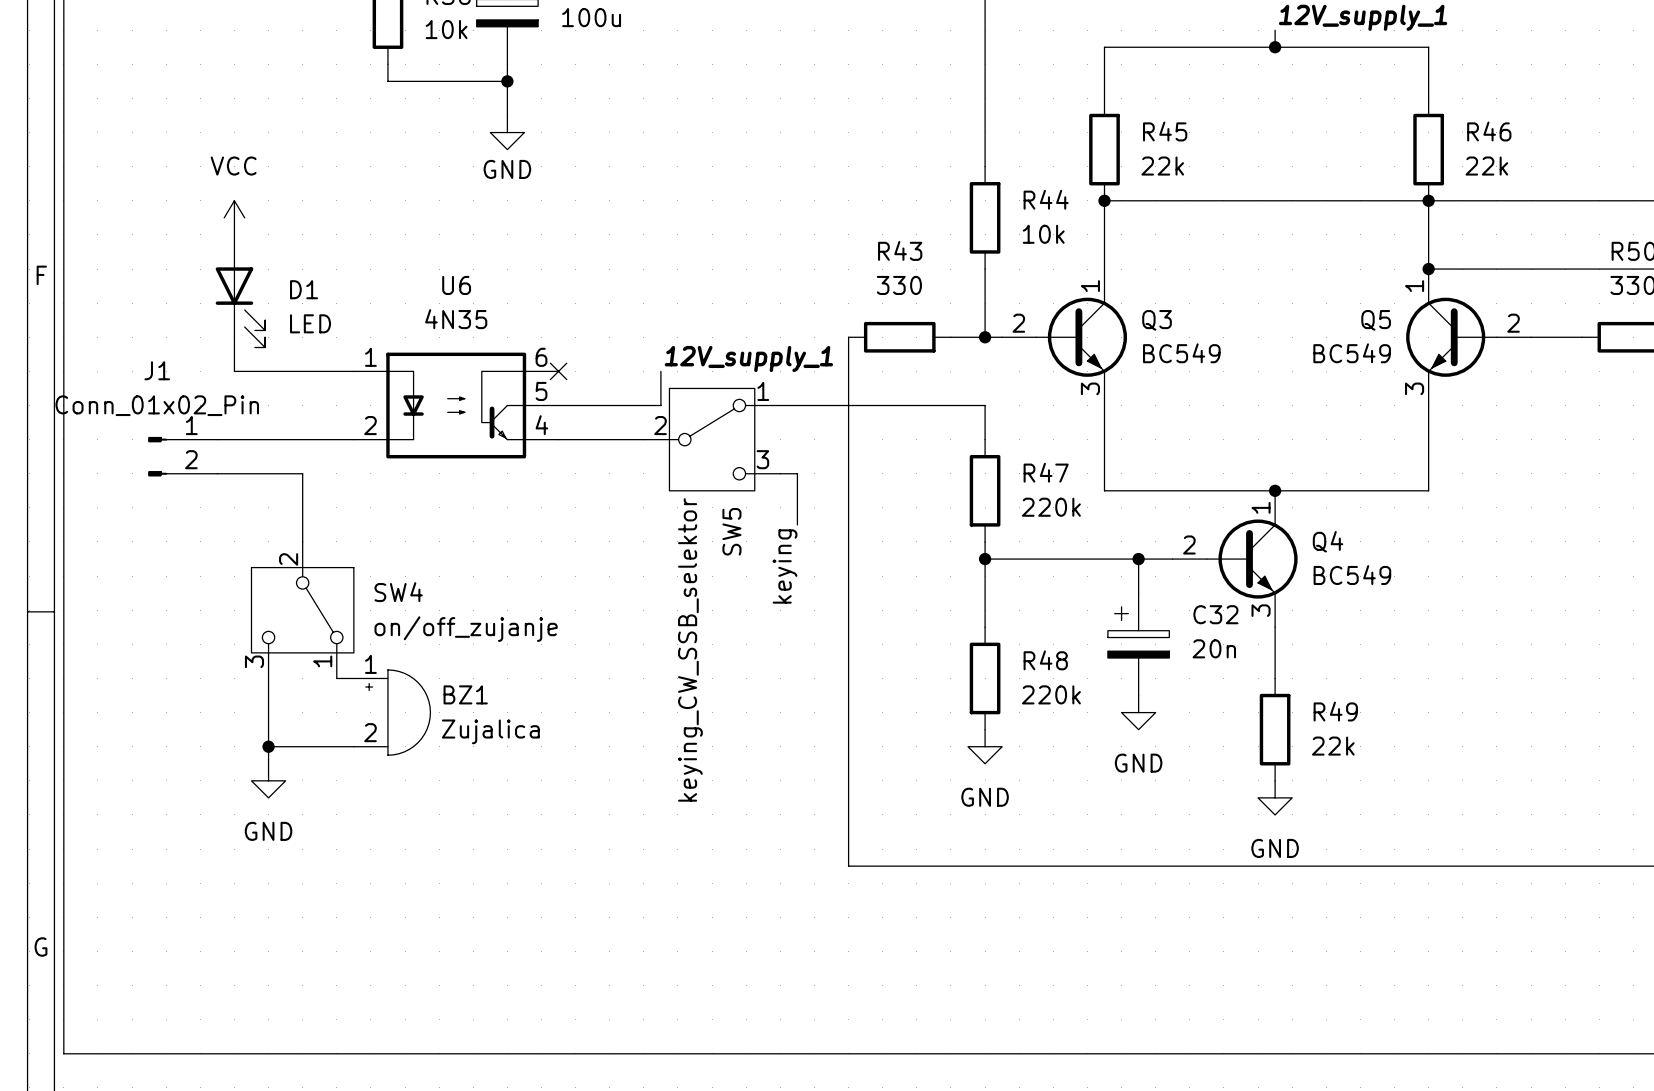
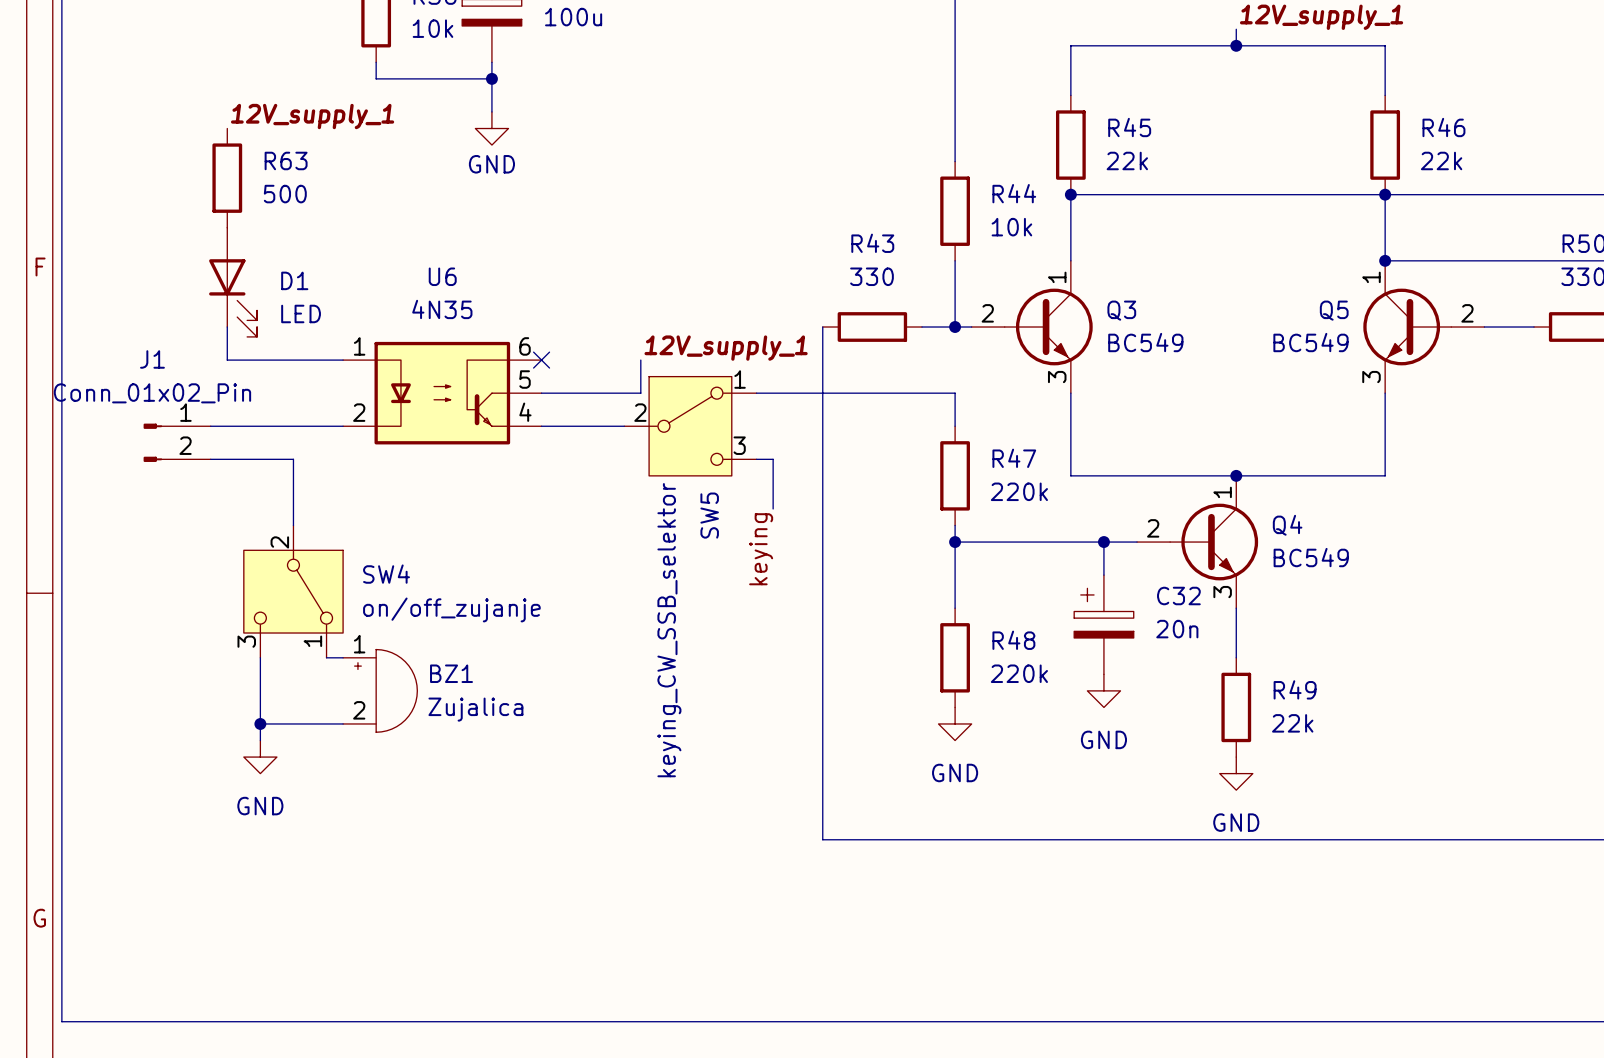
label: none -> 12V_supply_1 (312, 116)
R63: none -> 500 (227, 178)
power symbol: VCC (234, 217) -> none

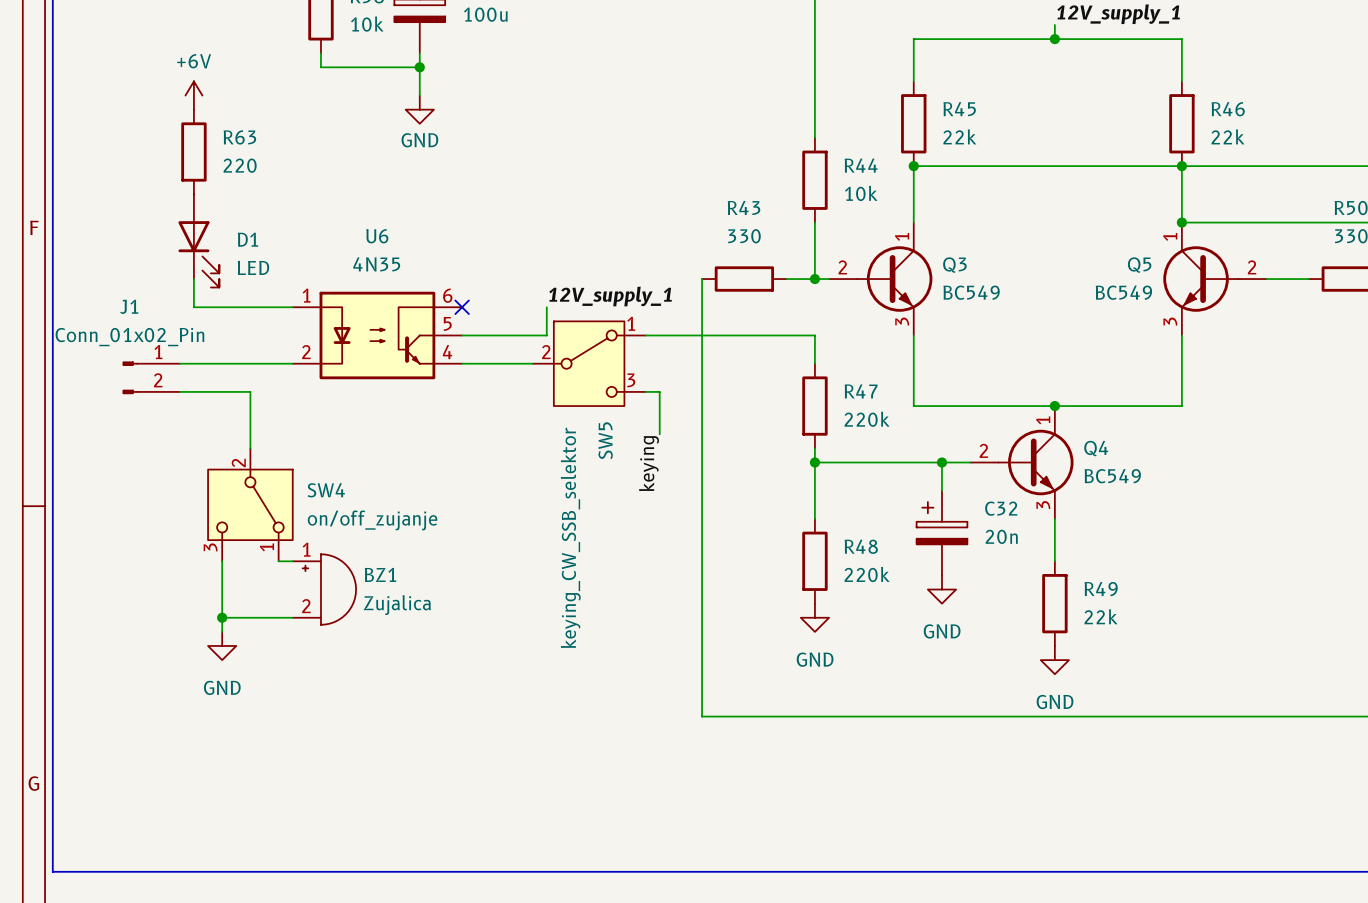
power symbol: none -> +6V (193, 95)
label: 12V_supply_1 (312, 116) -> none
R63 value: 500 (285, 194) -> 220 (240, 165)

